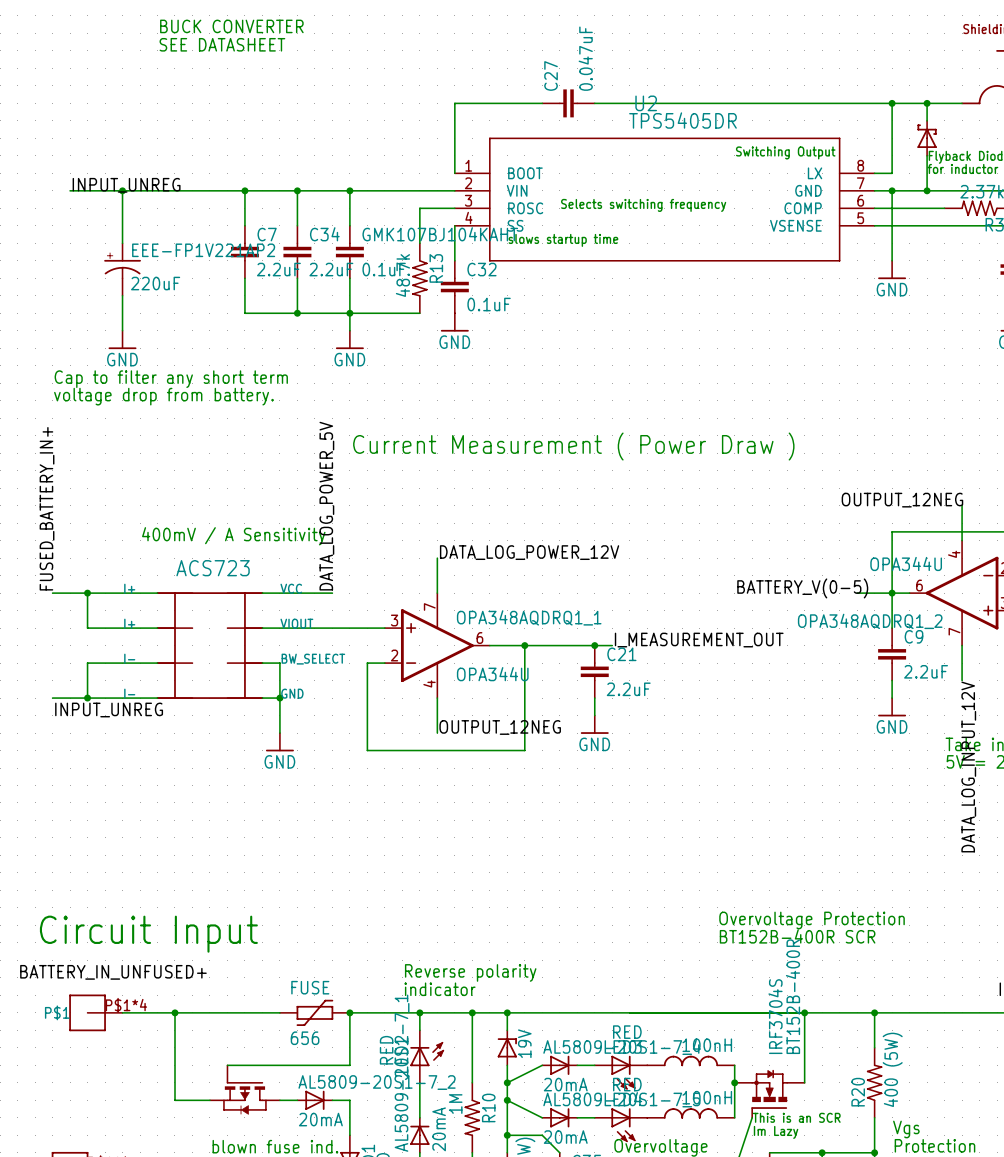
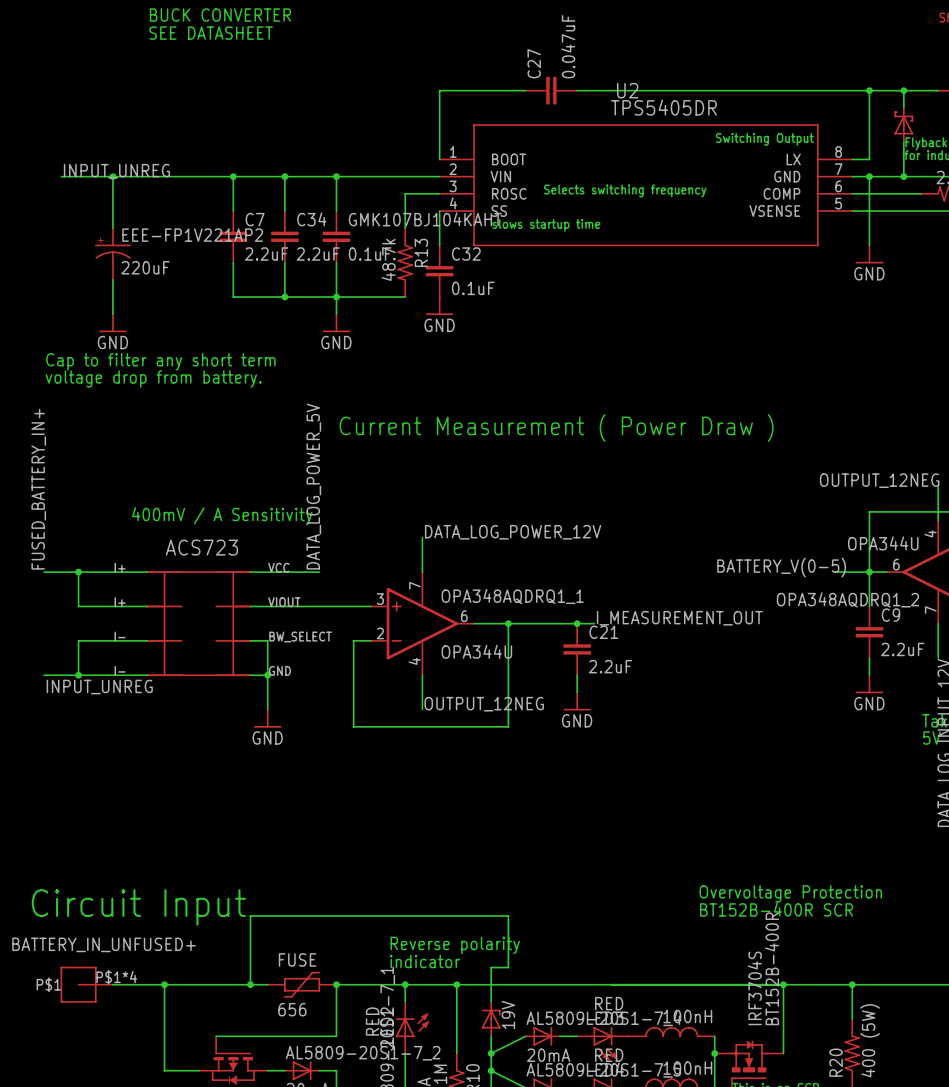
wire: none -> (250, 984) (250, 915) (508, 915) (508, 967) (491, 967) (491, 984)
junction: none -> (250, 984)
junction: (507, 1012) -> none

